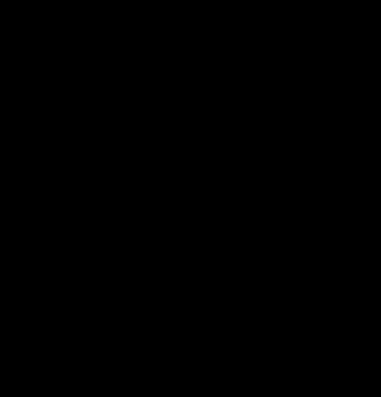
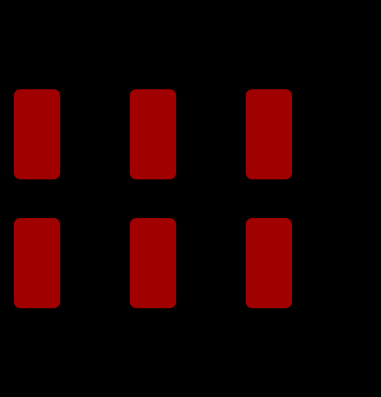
part: none -> (36, 198)
part: none -> (152, 198)
part: none -> (268, 198)

